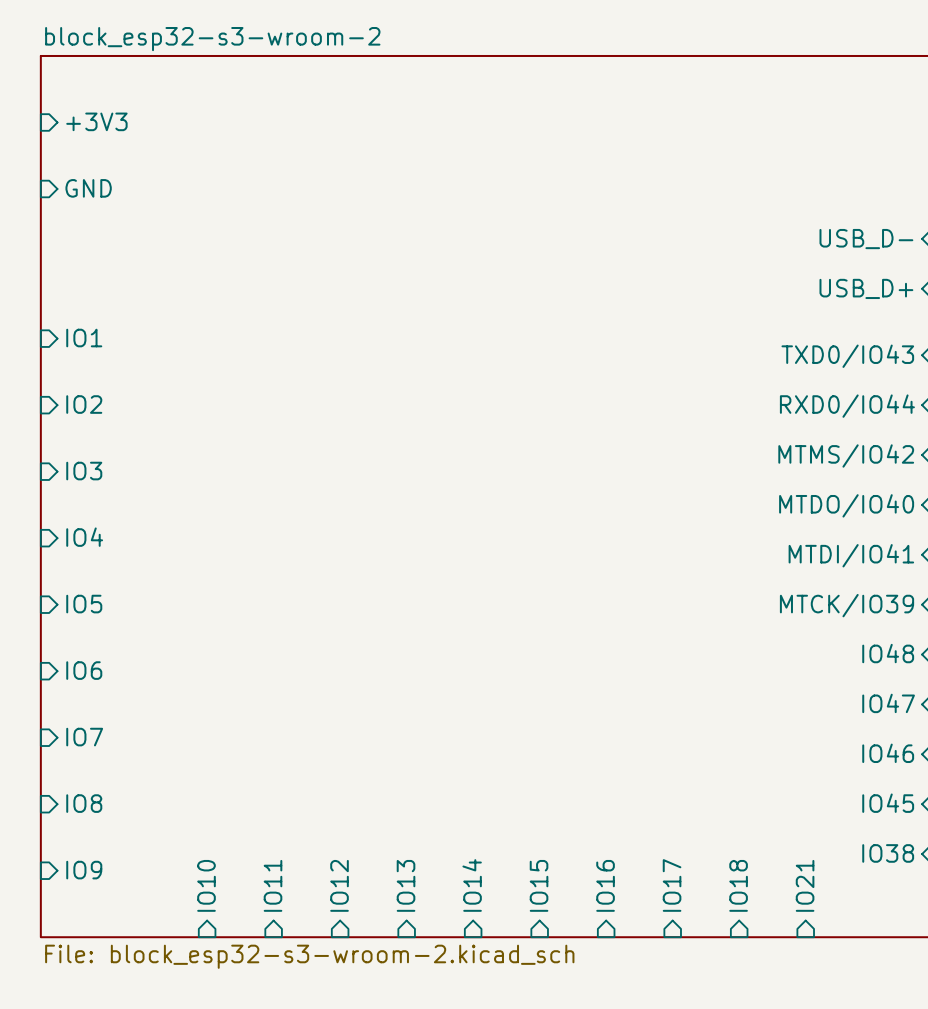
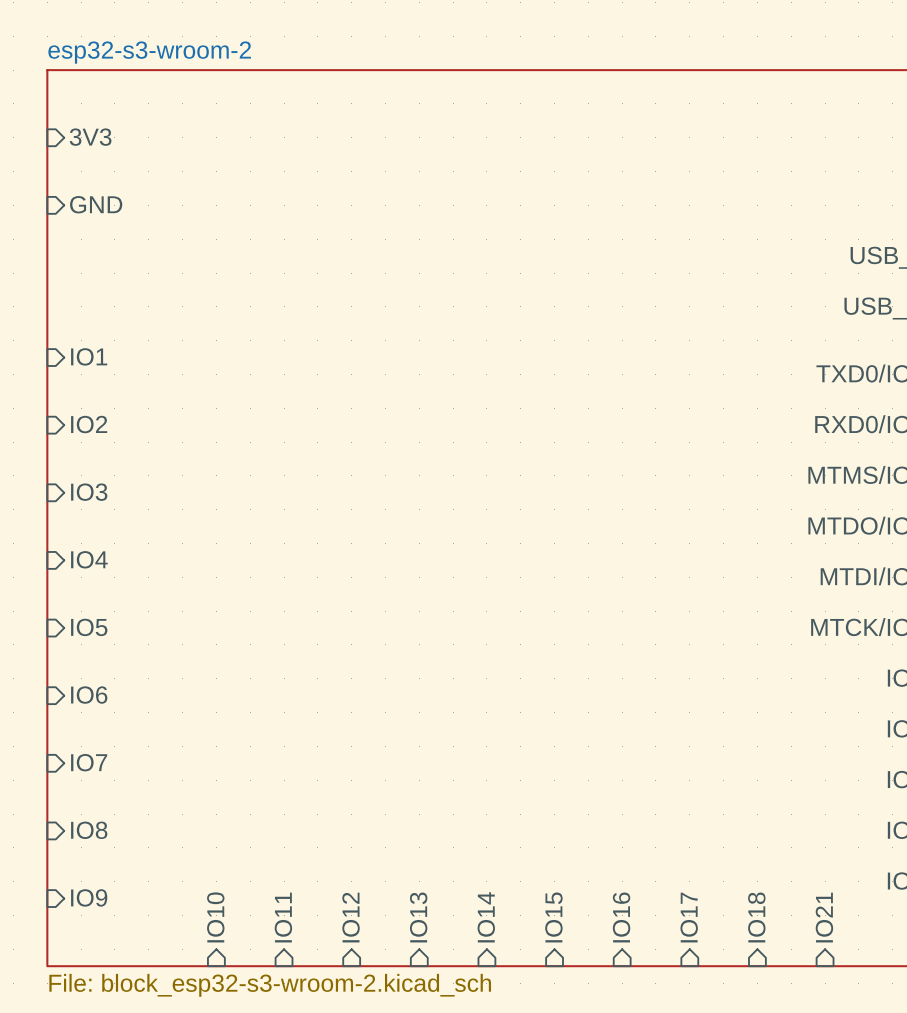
sheet block_esp32-s3-wroom-2 name: block_esp32-s3-wroom-2 (212, 39) -> esp32-s3-wroom-2 (149, 52)
sheet pin: +3V3 (96, 121) -> 3V3 (90, 137)

